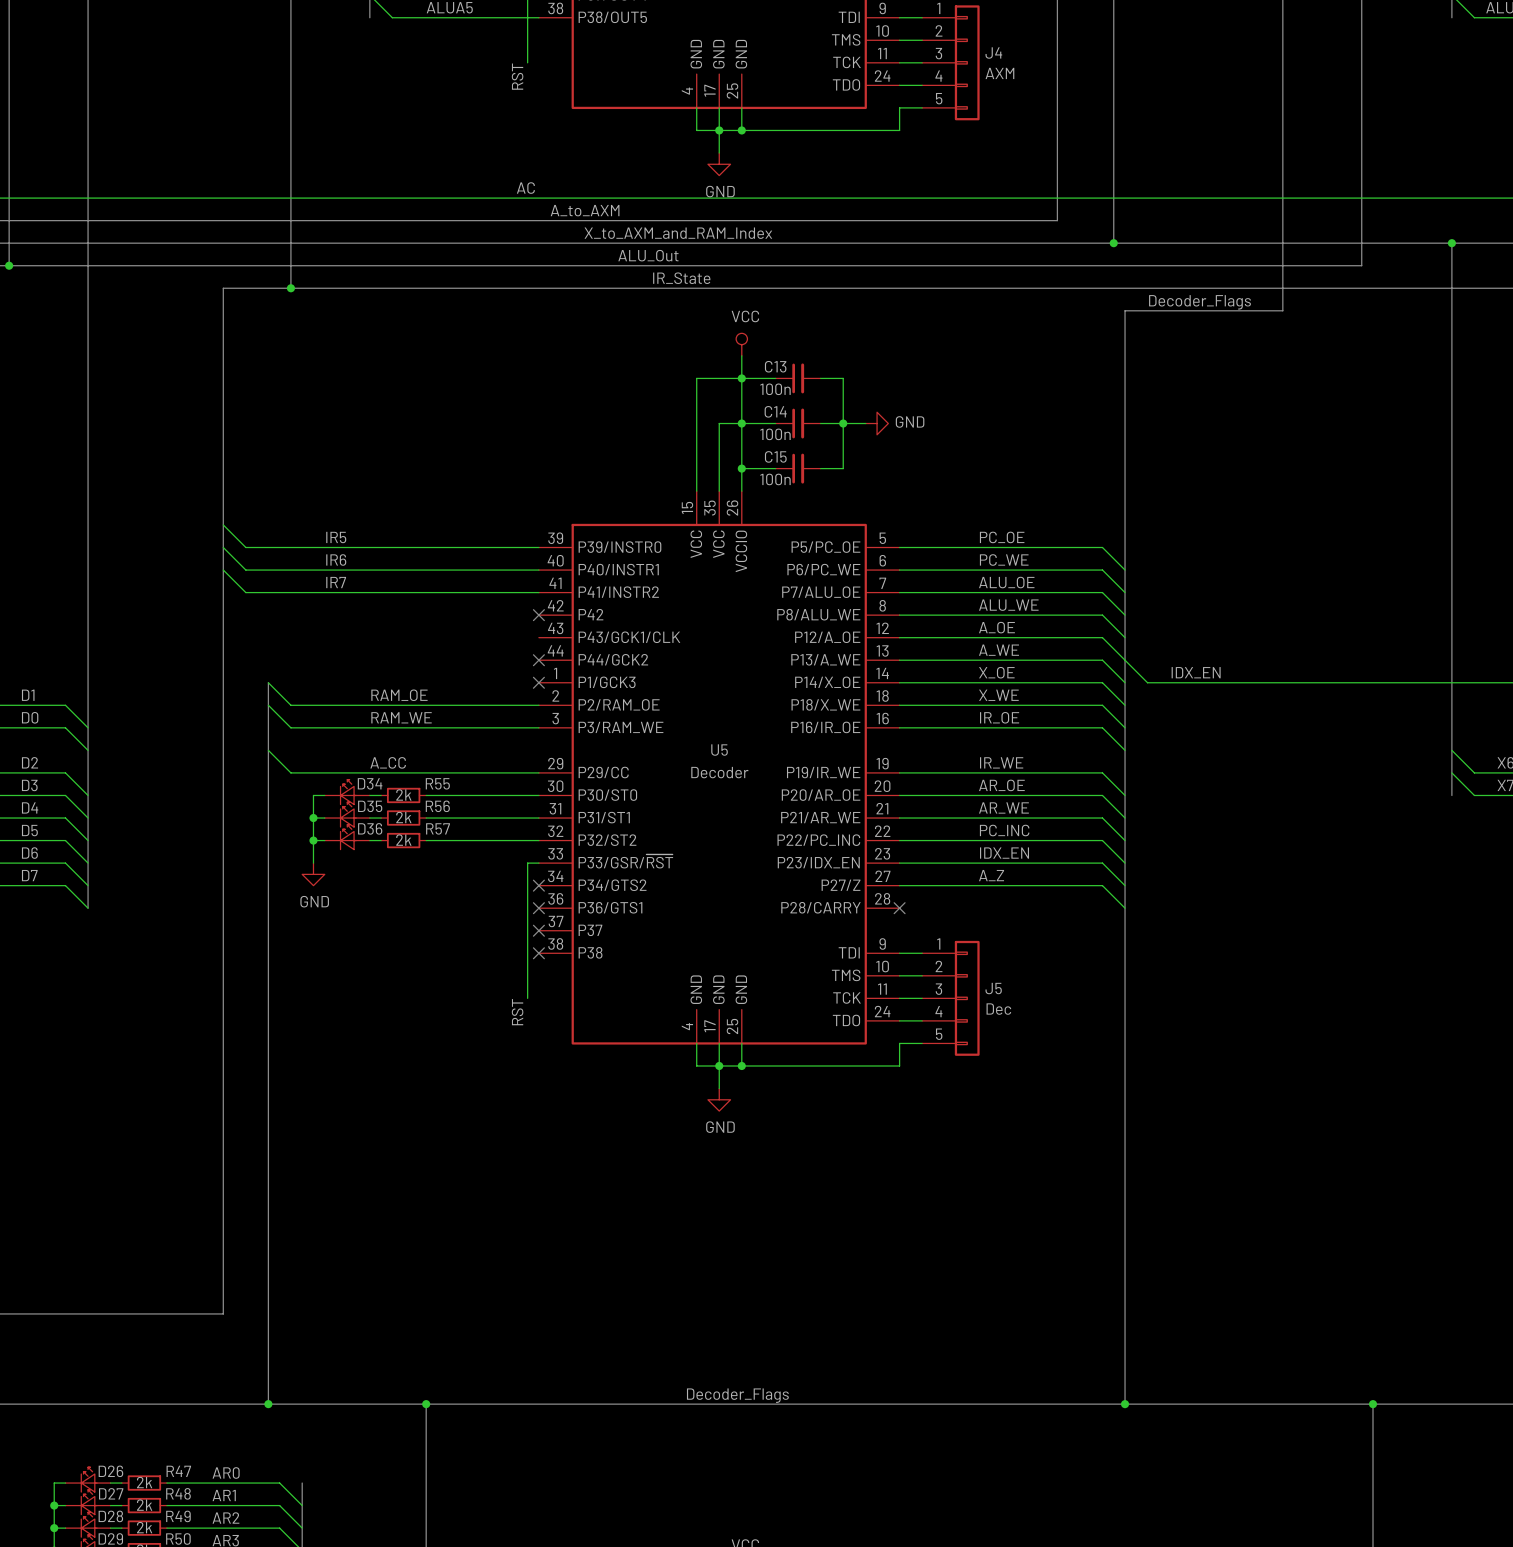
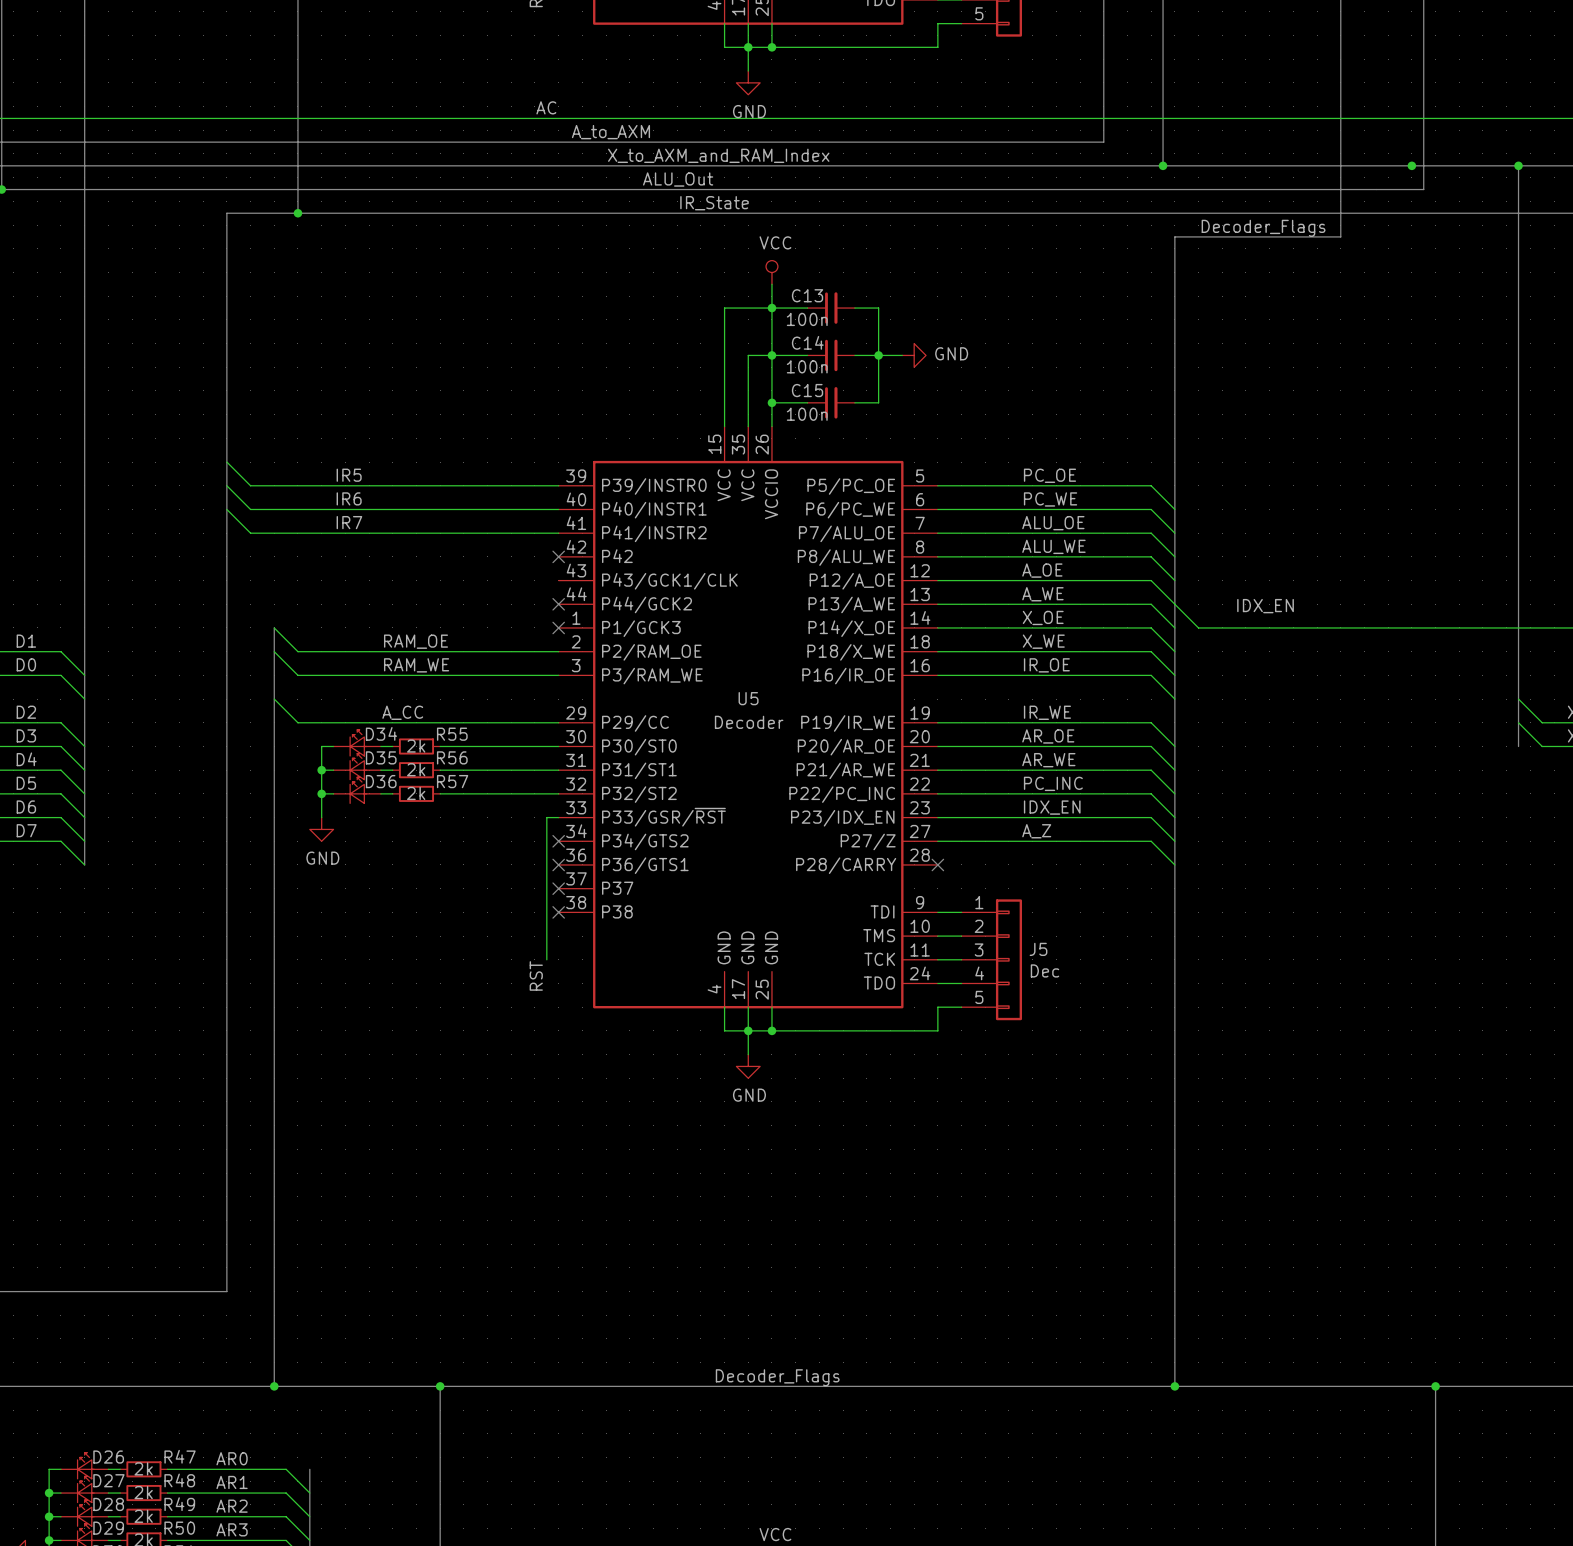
junction: none -> (1411, 165)
label position: IDX_EN (1196, 672) -> IDX_EN (1265, 606)

